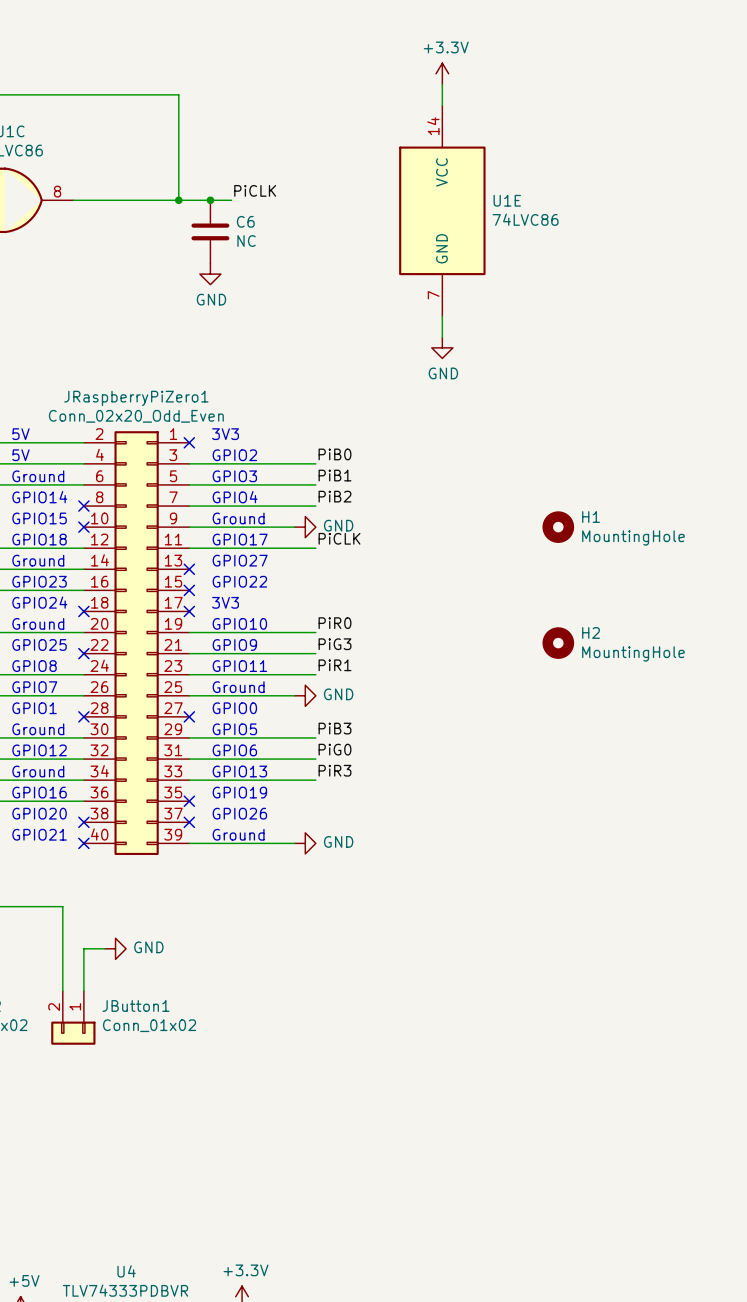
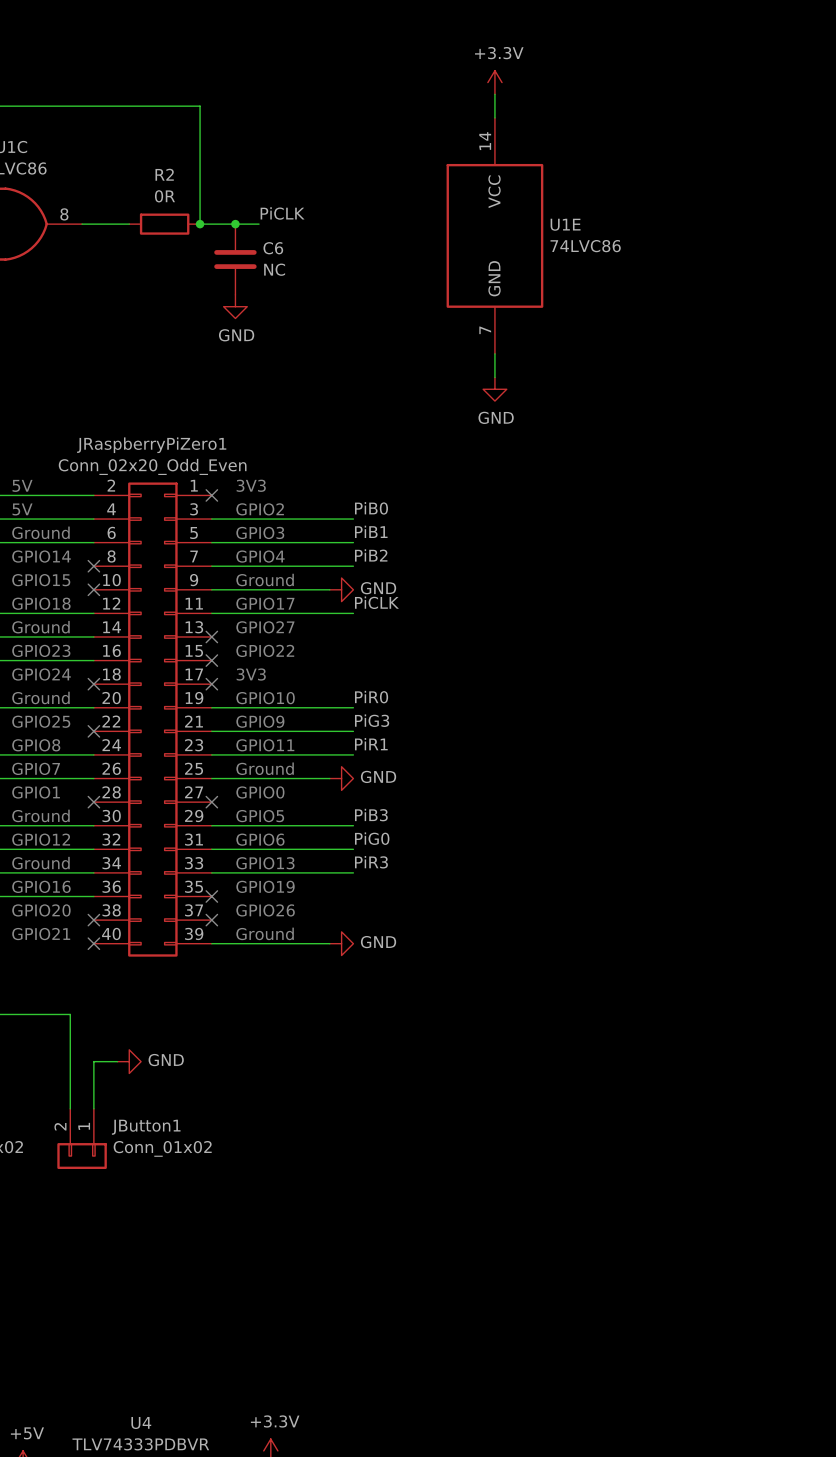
wire: (115, 200) (178, 200) -> none
R2: none -> 0R (164, 224)
H1: MountingHole (558, 527) -> none
H2: MountingHole (558, 643) -> none

